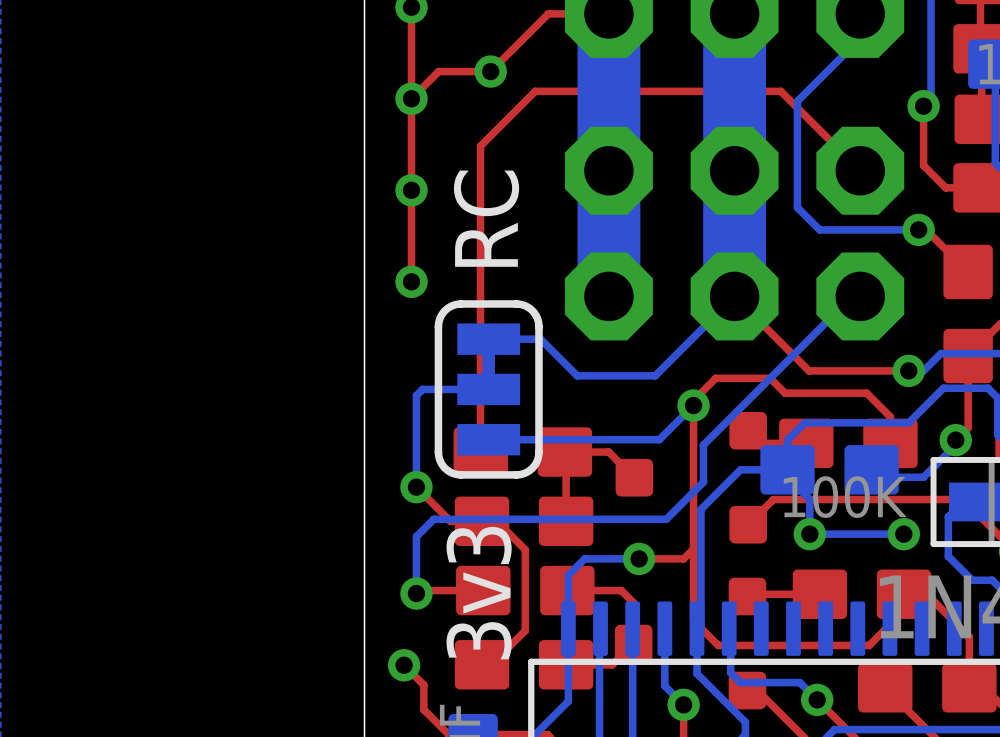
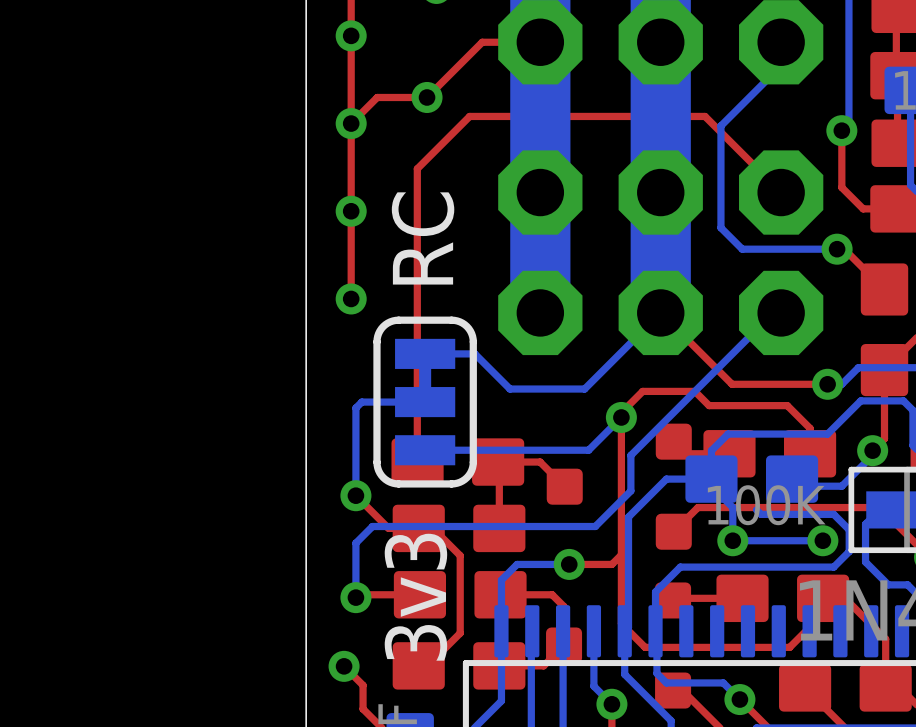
bottom track: none -> (756, 509) (760, 514) (833, 514) (849, 529) (849, 551) (833, 567) (680, 567) (655, 591) (655, 631)

